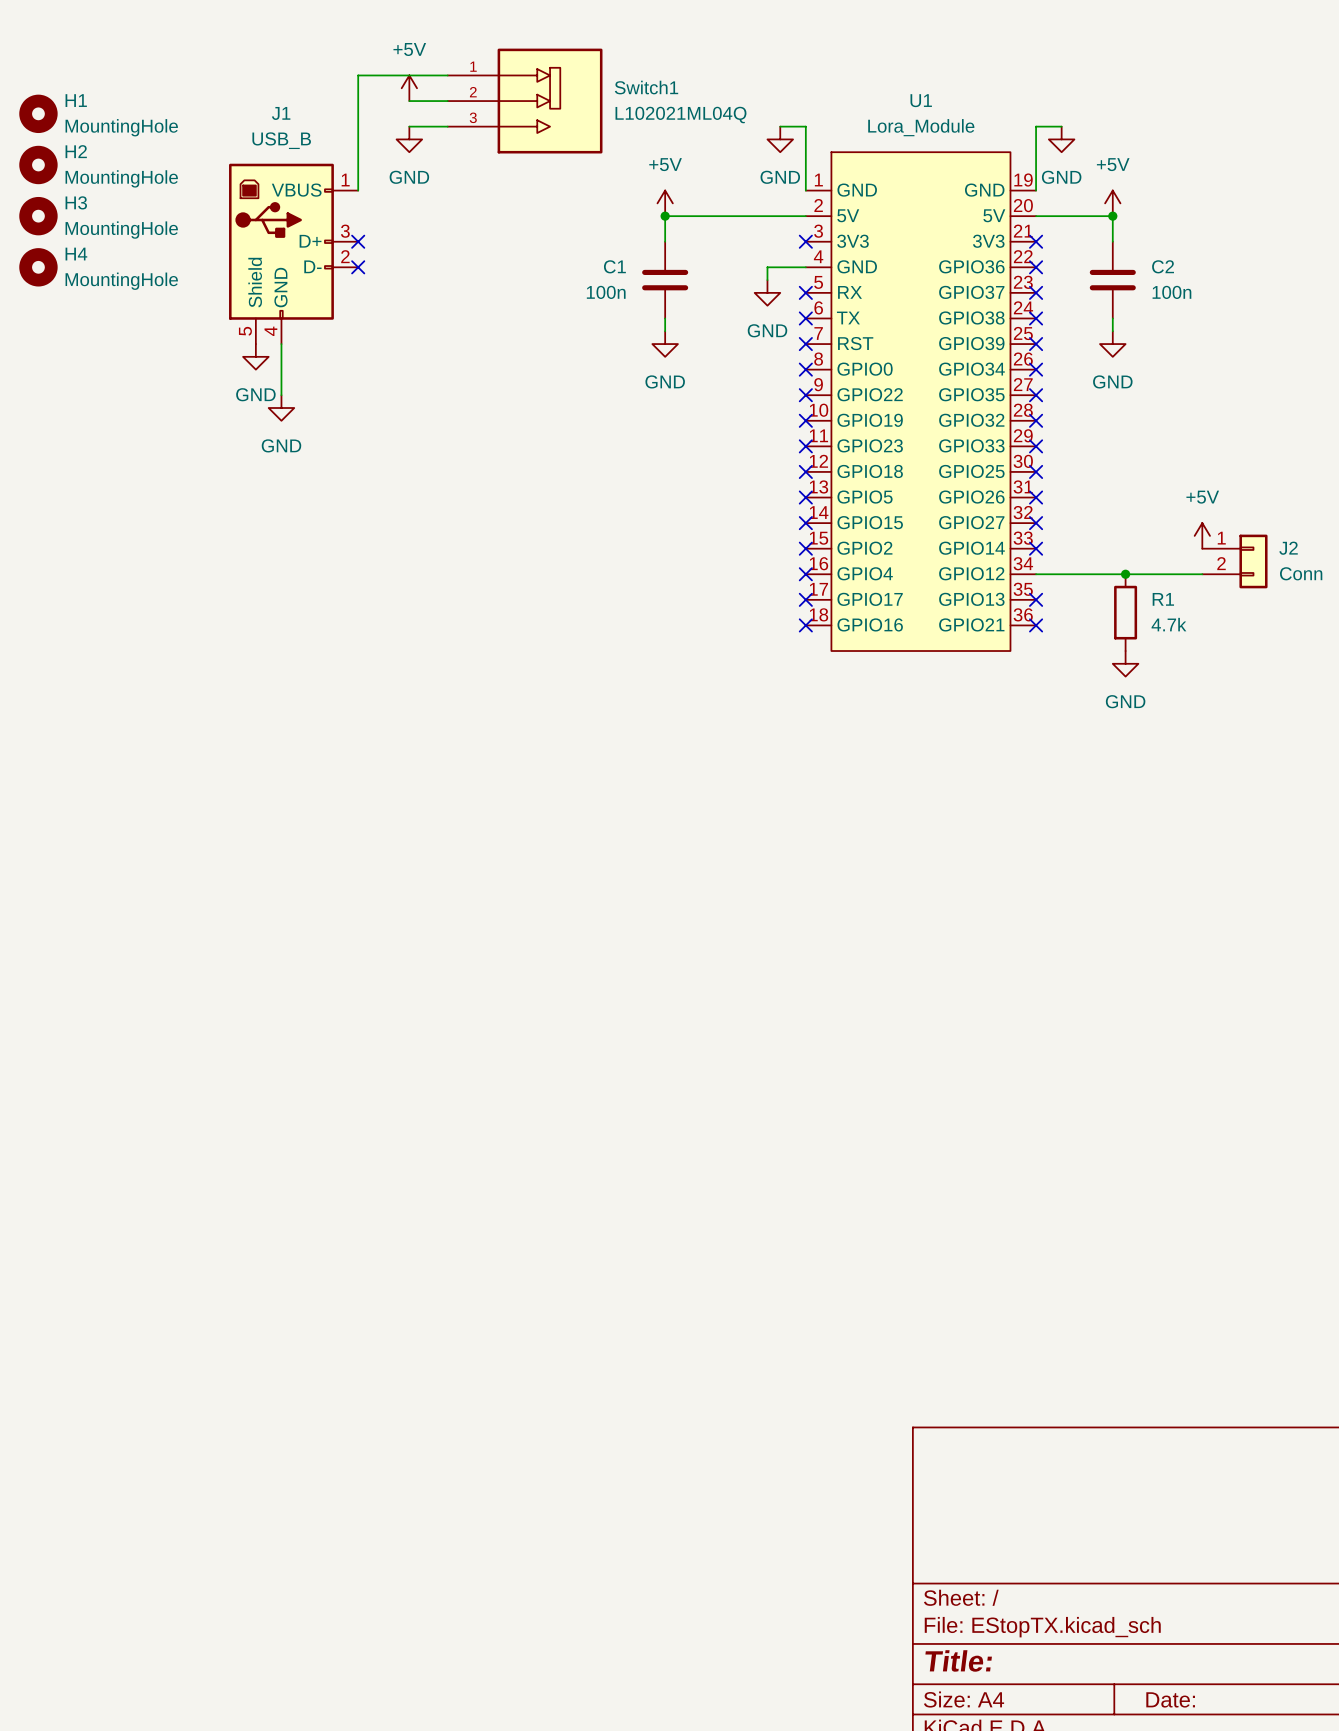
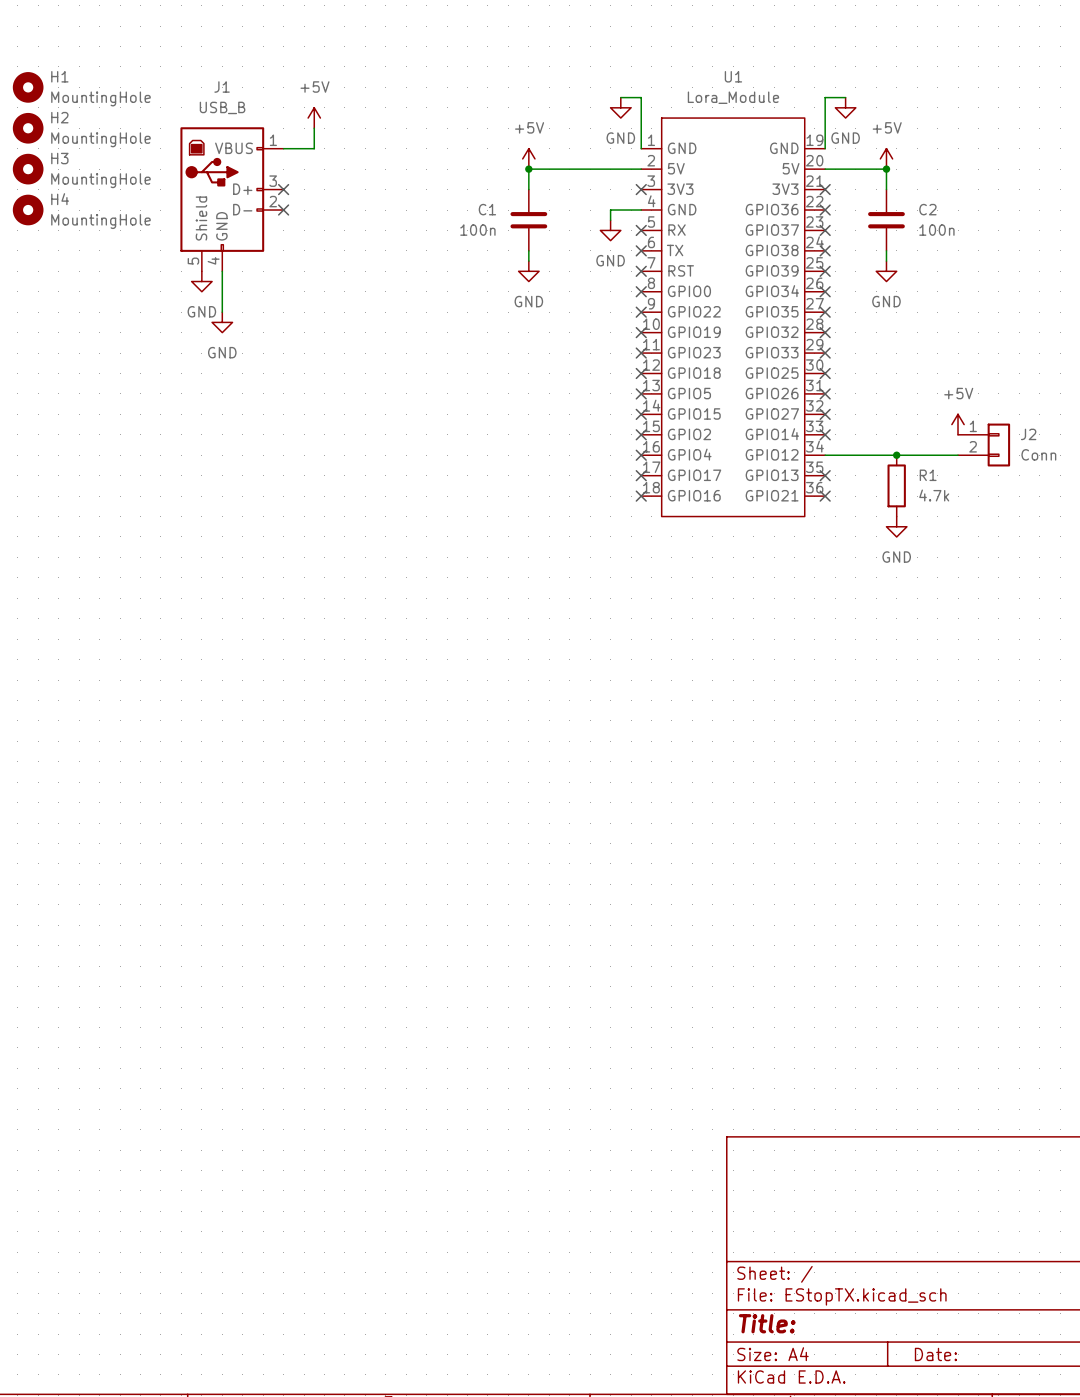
wire: (447, 75) (358, 75) (358, 190) -> (314, 128) (314, 148) (283, 148)
power symbol position: +5V (409, 88) -> +5V (314, 118)
wire: (409, 101) (447, 101) -> none
Switch1: L102021ML04Q (525, 101) -> none
wire: (409, 126) (447, 126) -> none
power symbol: GND (409, 139) -> none

